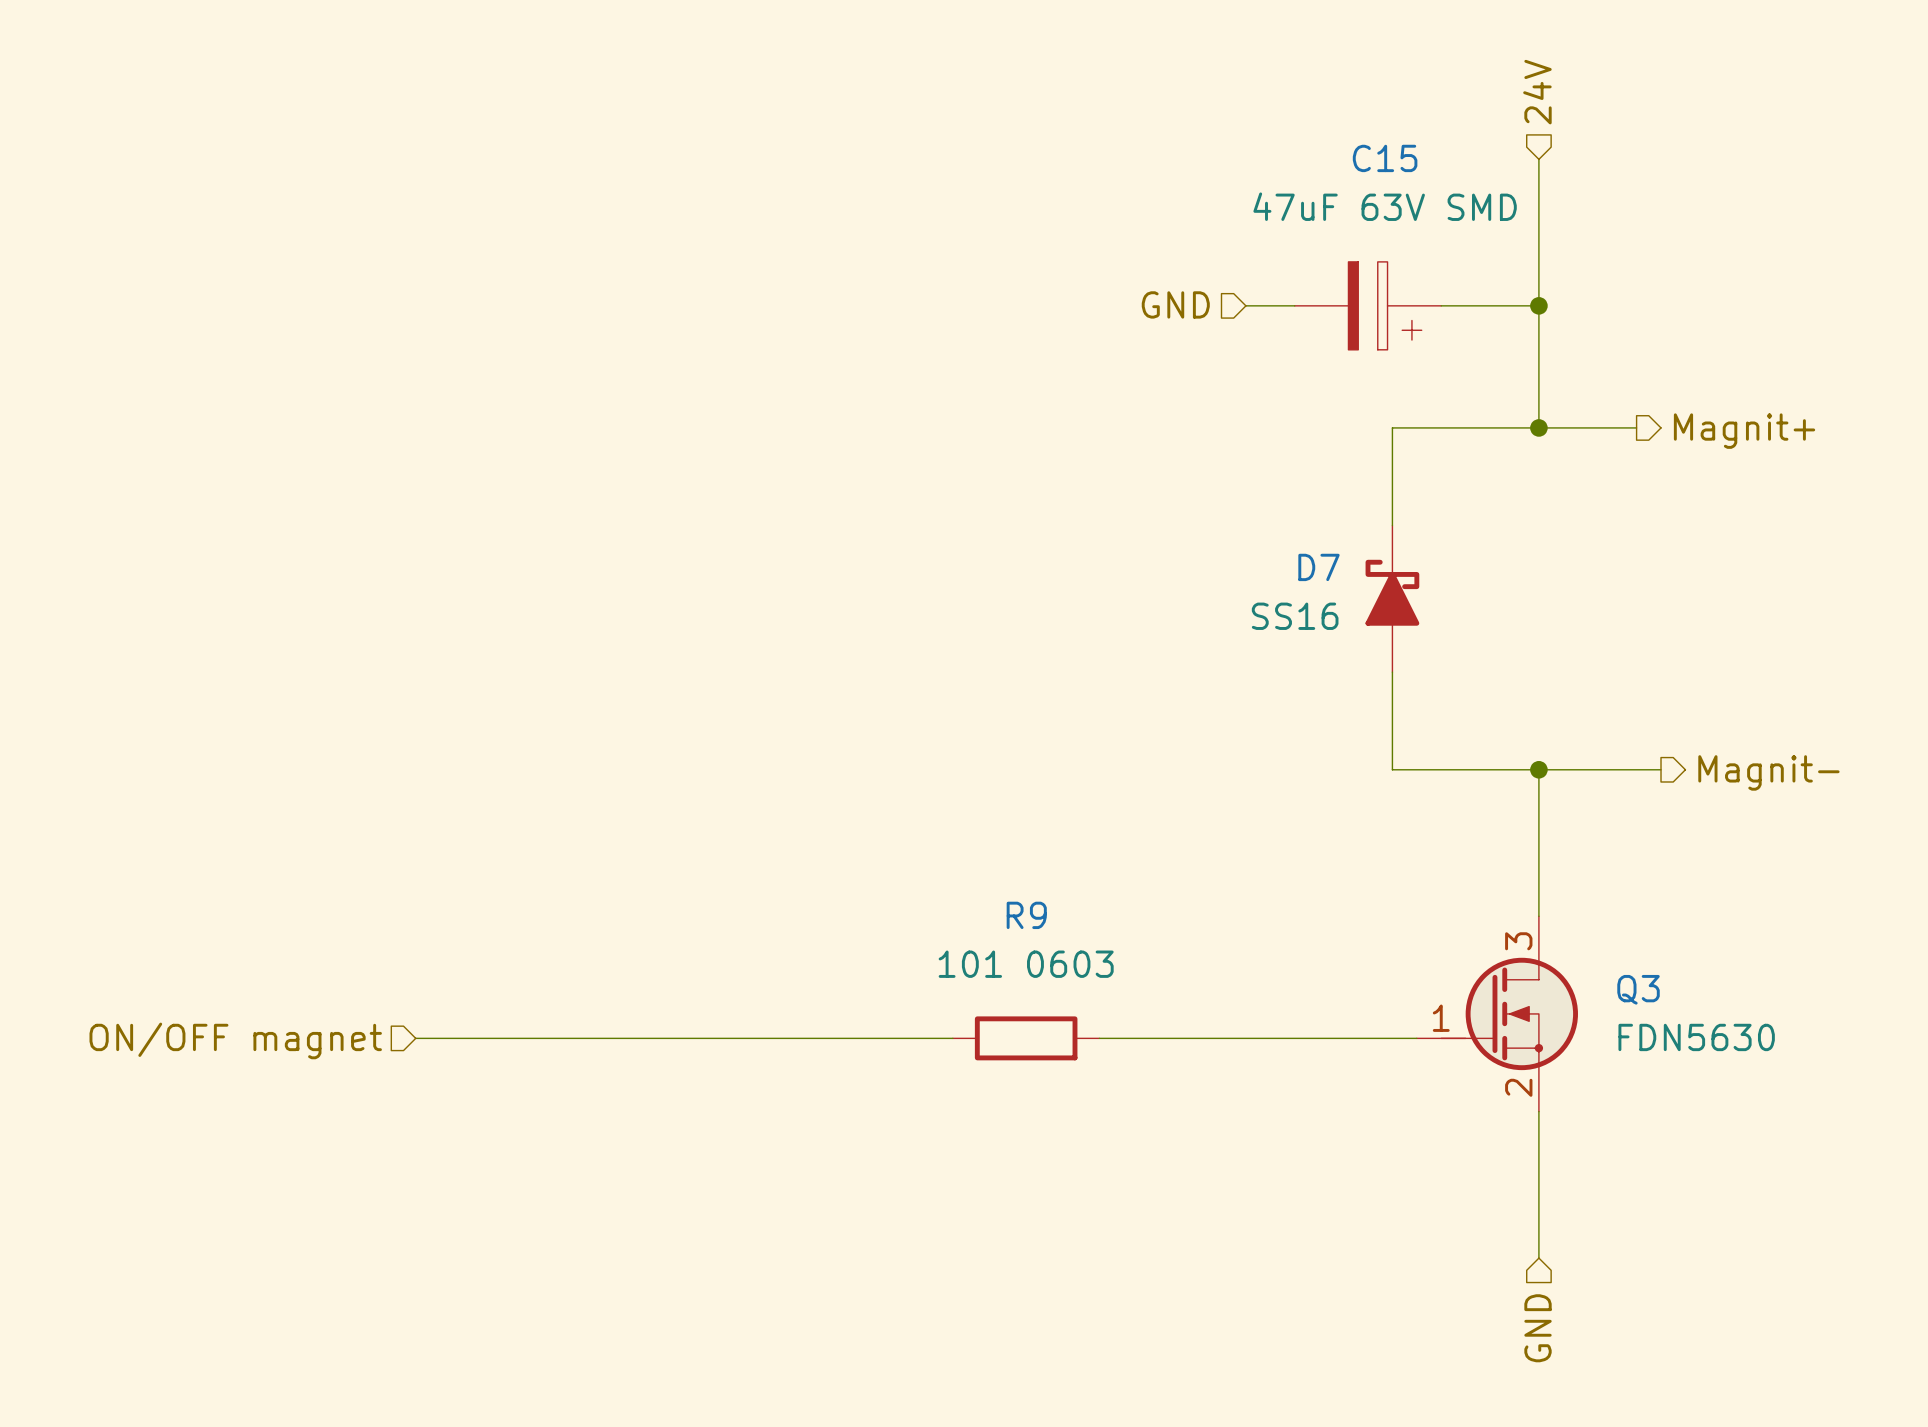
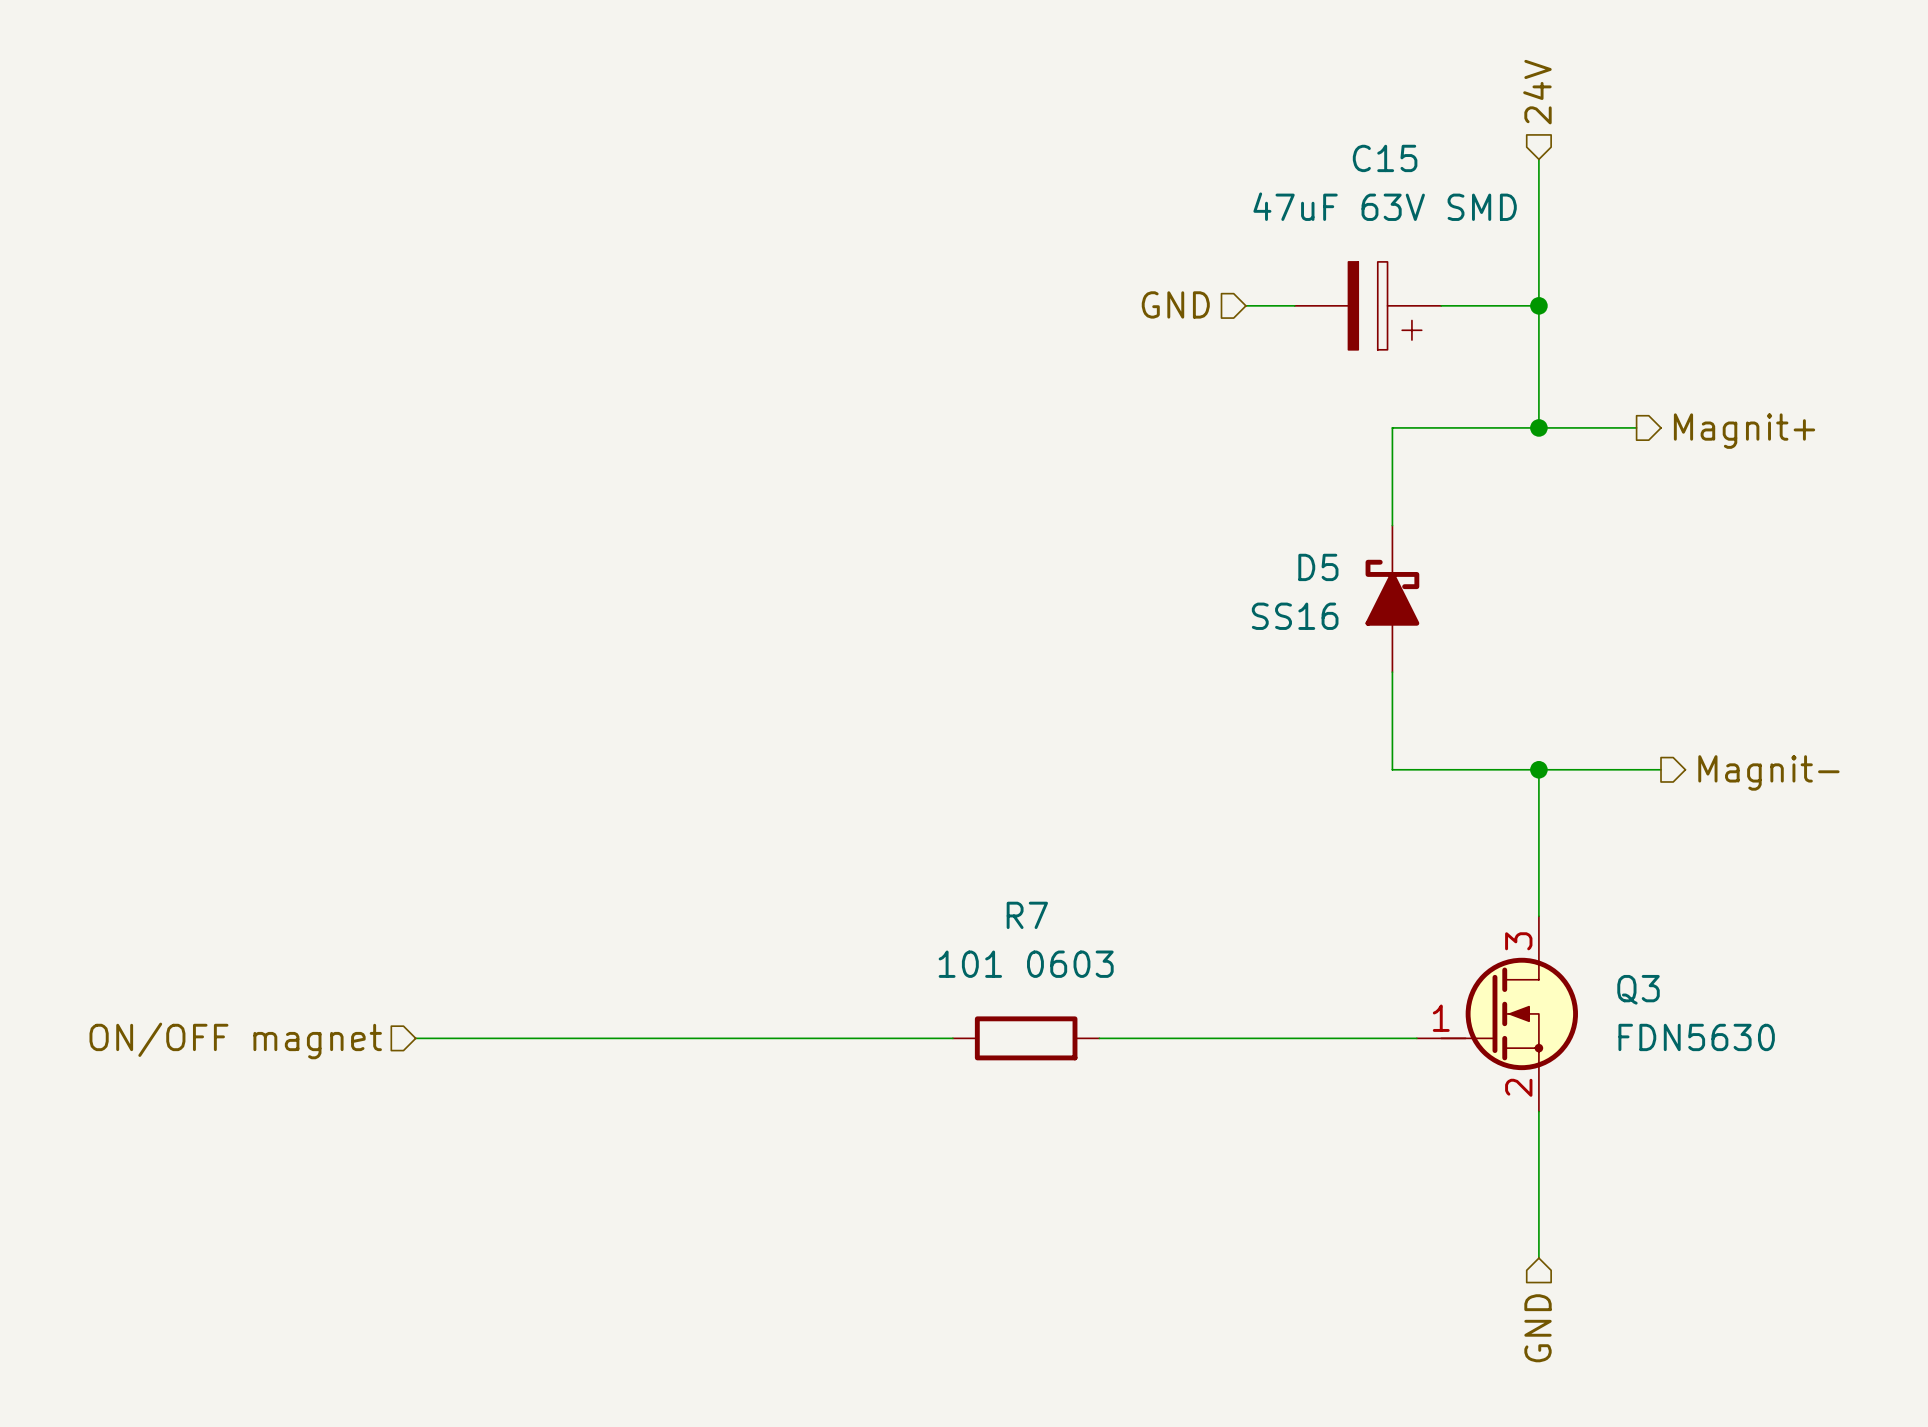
D7 name: D7 (1318, 567) -> D5 (1318, 567)
R9 name: R9 (1026, 915) -> R7 (1027, 915)

